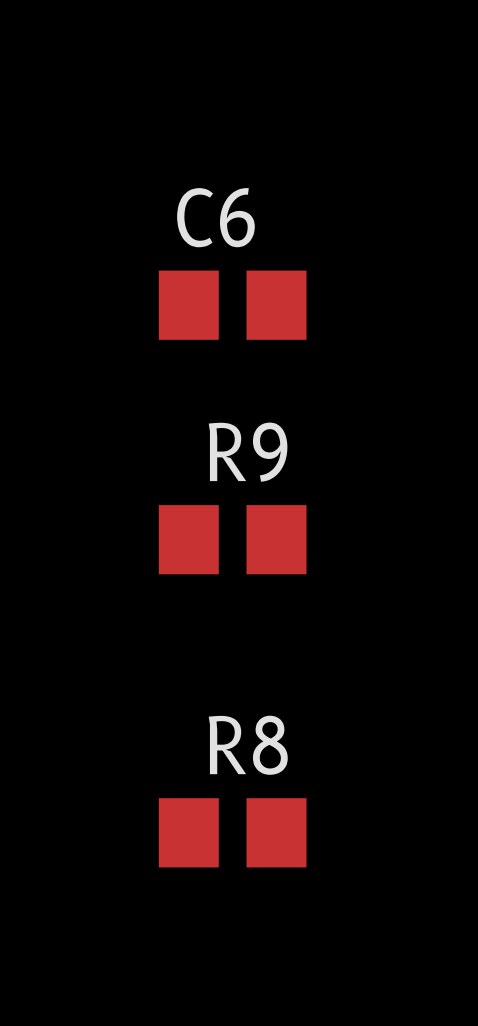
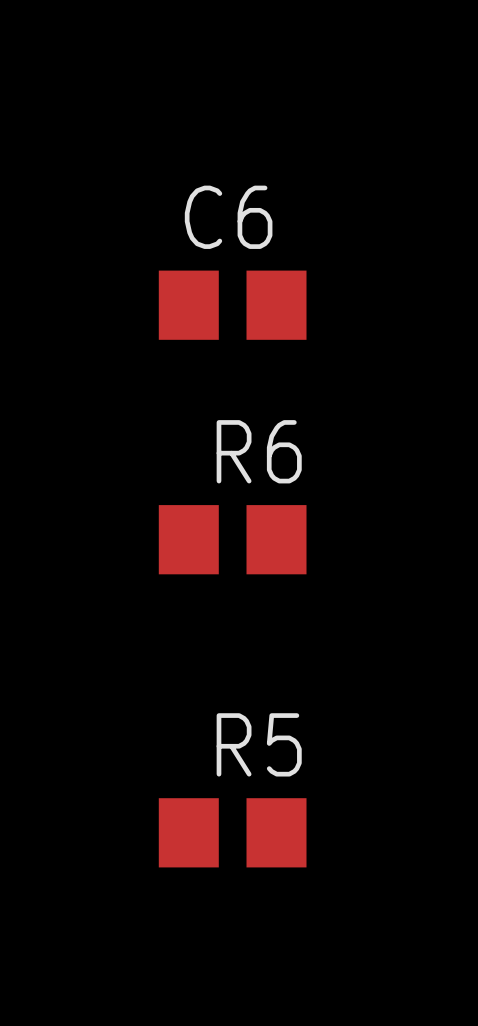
R9 name: R9 (248, 452) -> R6 (259, 451)
R8 name: R8 (248, 745) -> R5 (259, 744)

